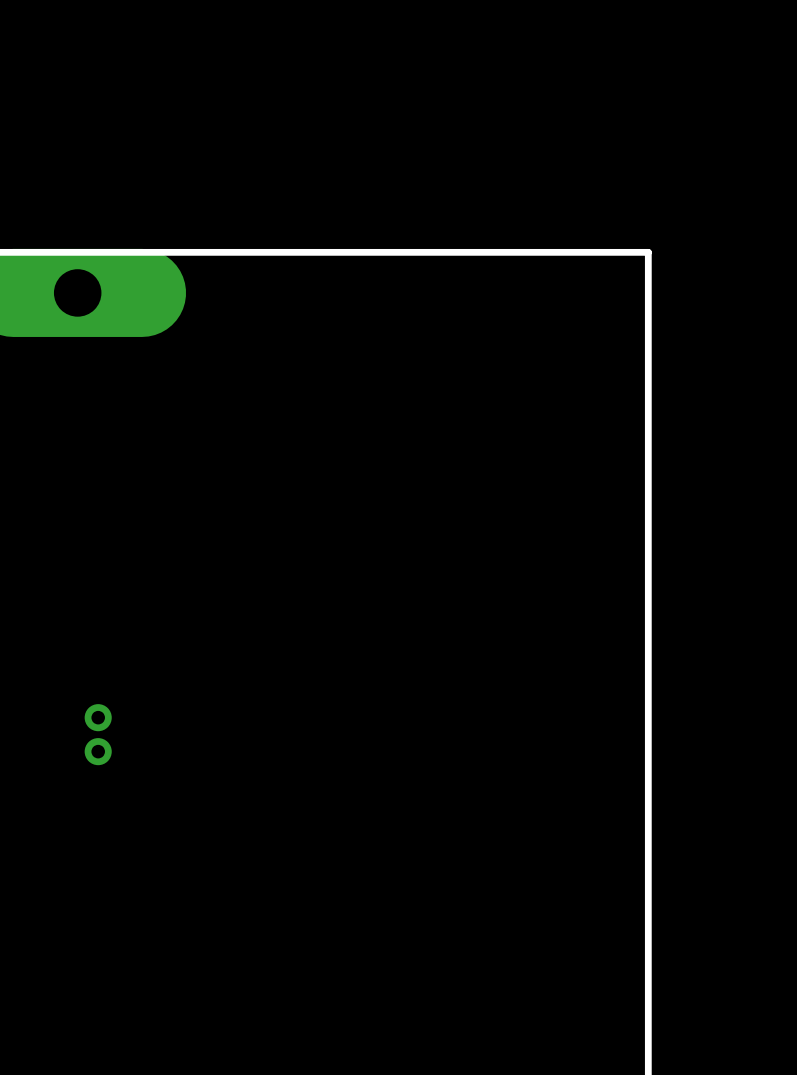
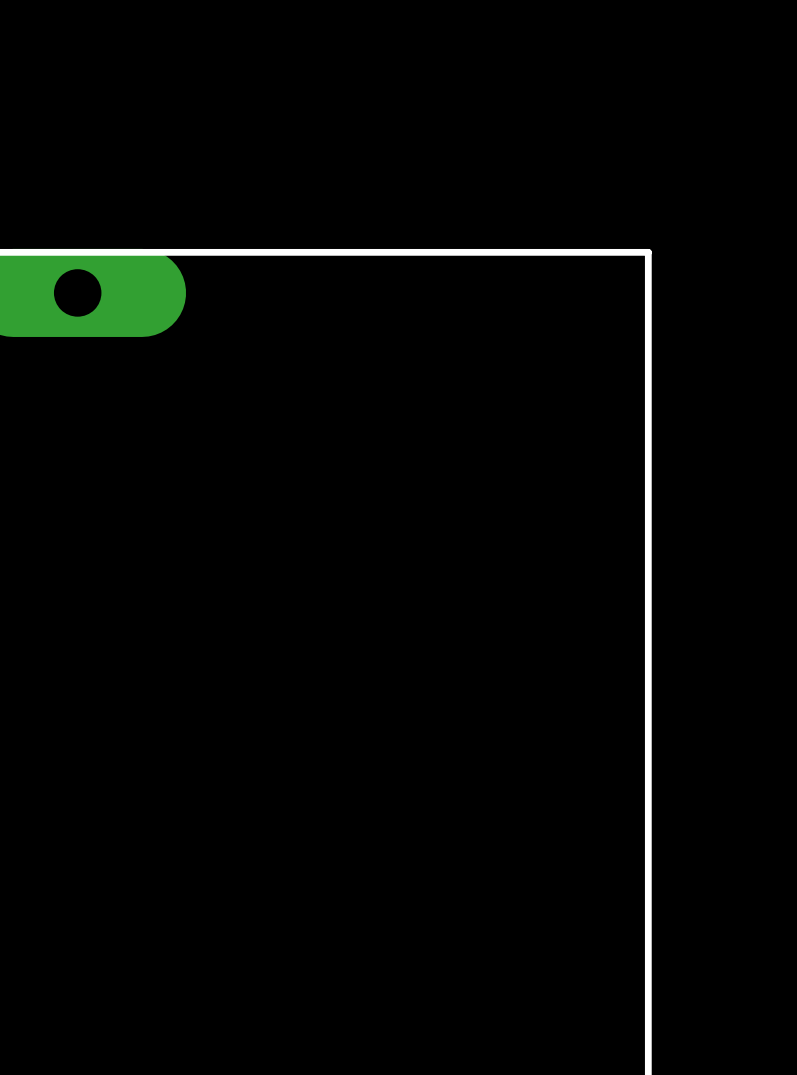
via: (98, 717) -> none
via: (98, 751) -> none

